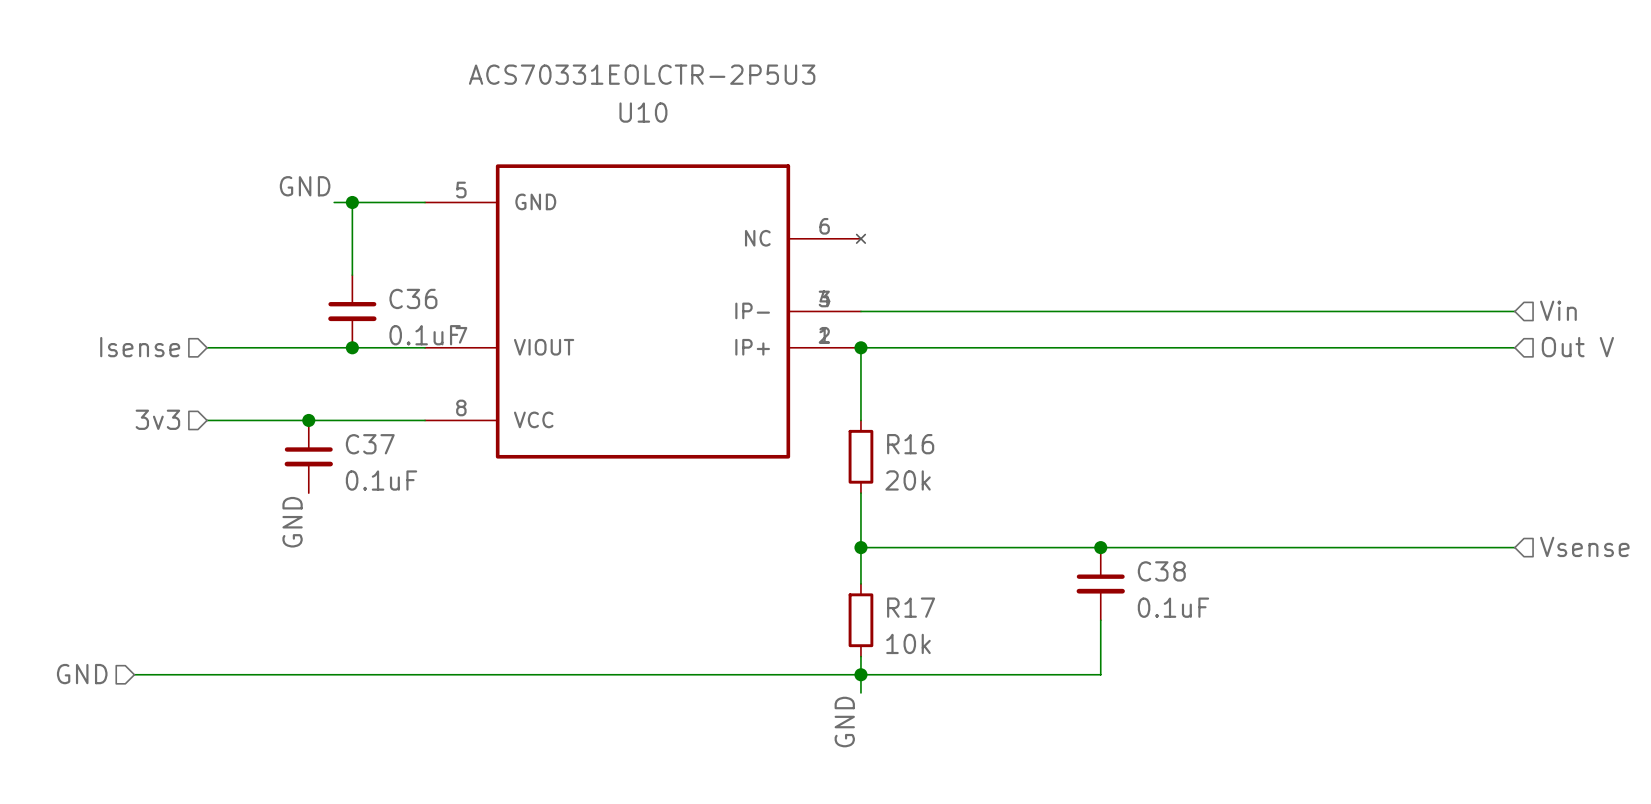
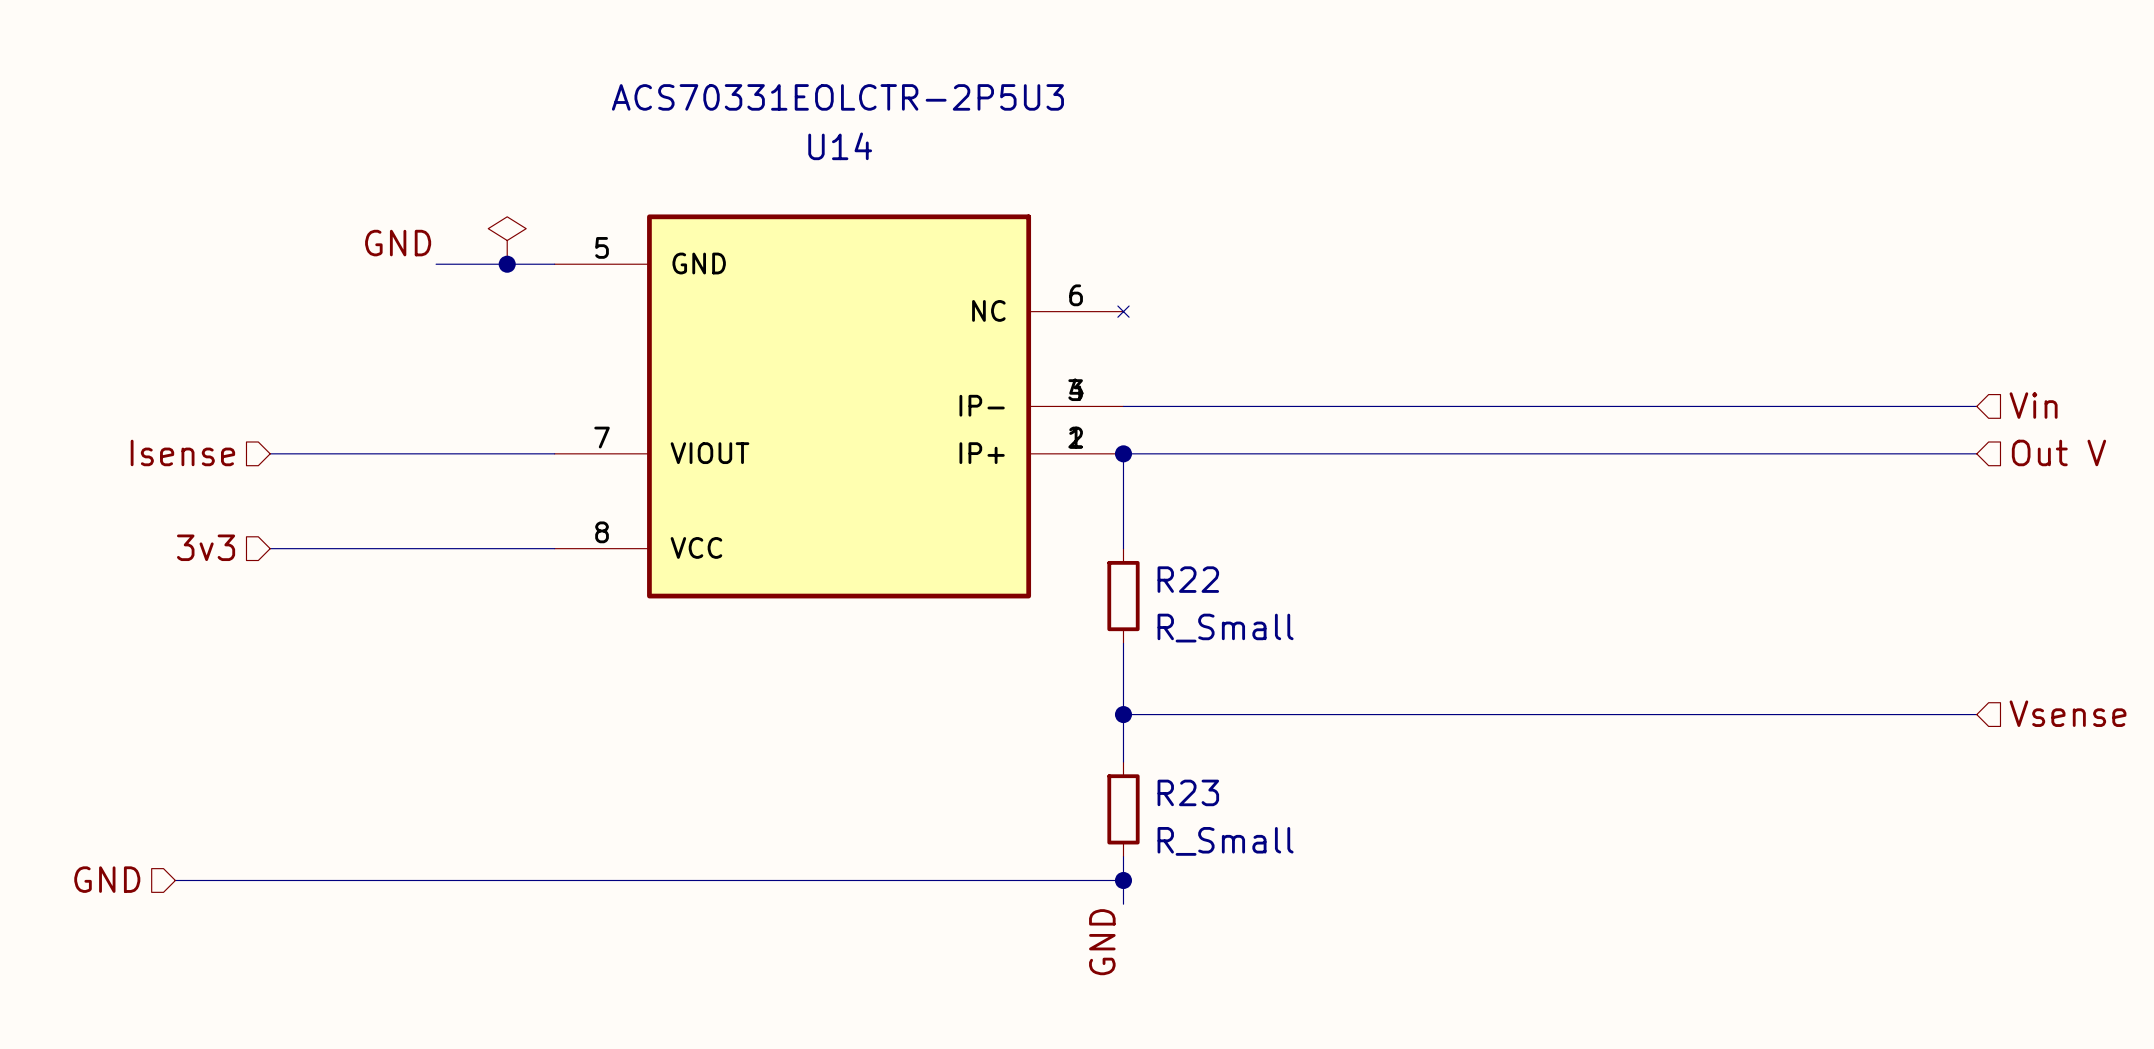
U10 name: U10 (643, 112) -> U14 (840, 146)
power symbol: none -> (507, 240)
wire: (352, 202) (352, 275) -> none
junction position: (352, 202) -> (507, 264)
C36: 0.1uF (352, 311) -> none
junction: (352, 347) -> none
junction: (308, 420) -> none
R16 name: R16 (910, 444) -> R22 (1188, 579)
C37: 0.1uF (308, 456) -> none
R16 value: 20k (908, 480) -> R_Small (1225, 628)
label: GND (292, 522) -> none
junction: (1100, 547) -> none
C38: 0.1uF (1100, 583) -> none
R17 name: R17 (911, 607) -> R23 (1188, 792)
wire: (1100, 620) (1100, 674) (860, 674) -> none
R17 value: 10k (908, 643) -> R_Small (1225, 841)

